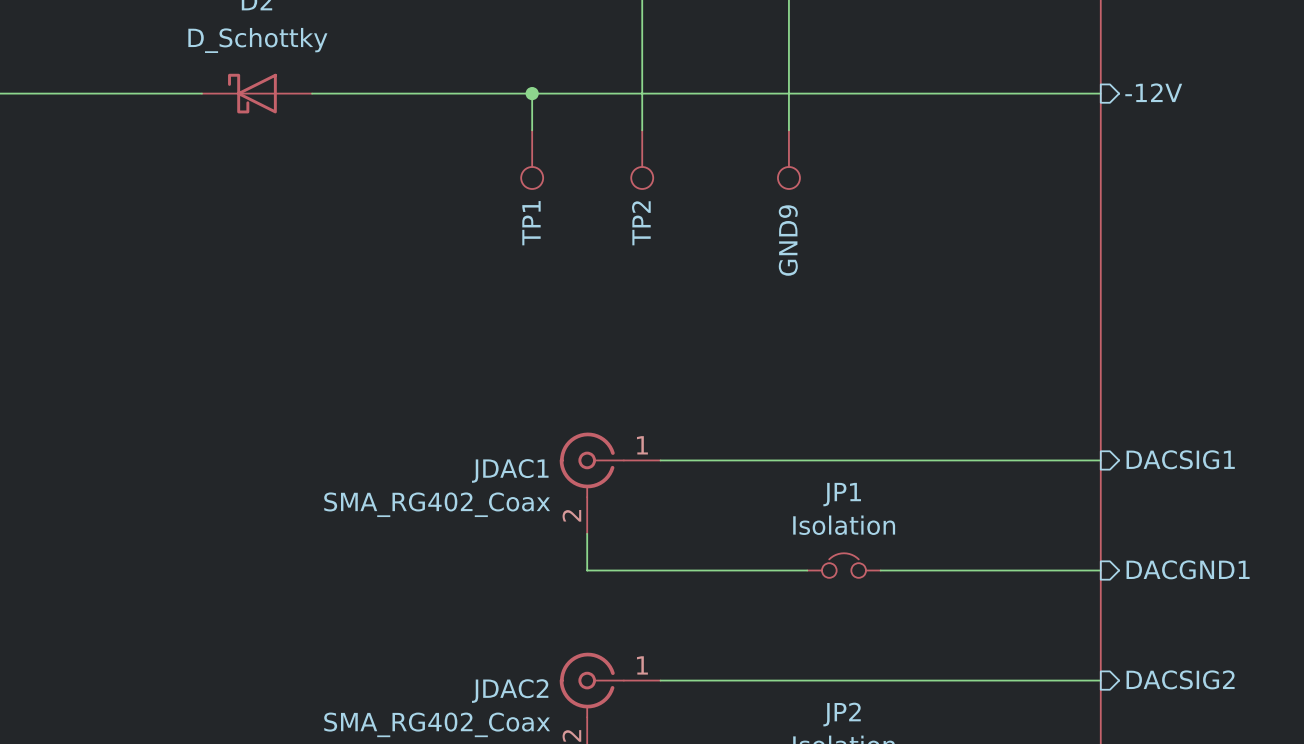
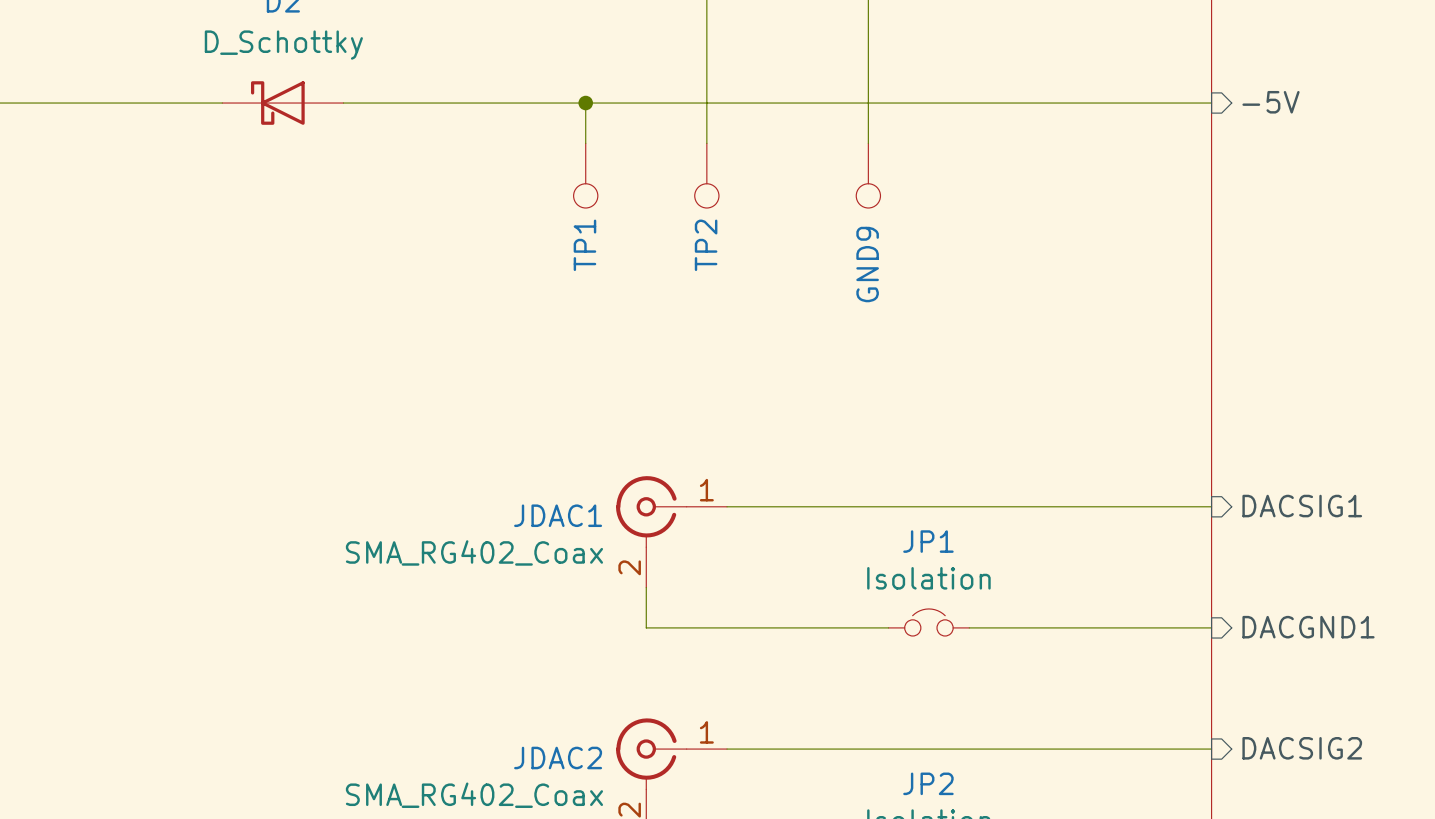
sheet pin: -12V (1153, 92) -> -5V (1271, 102)

